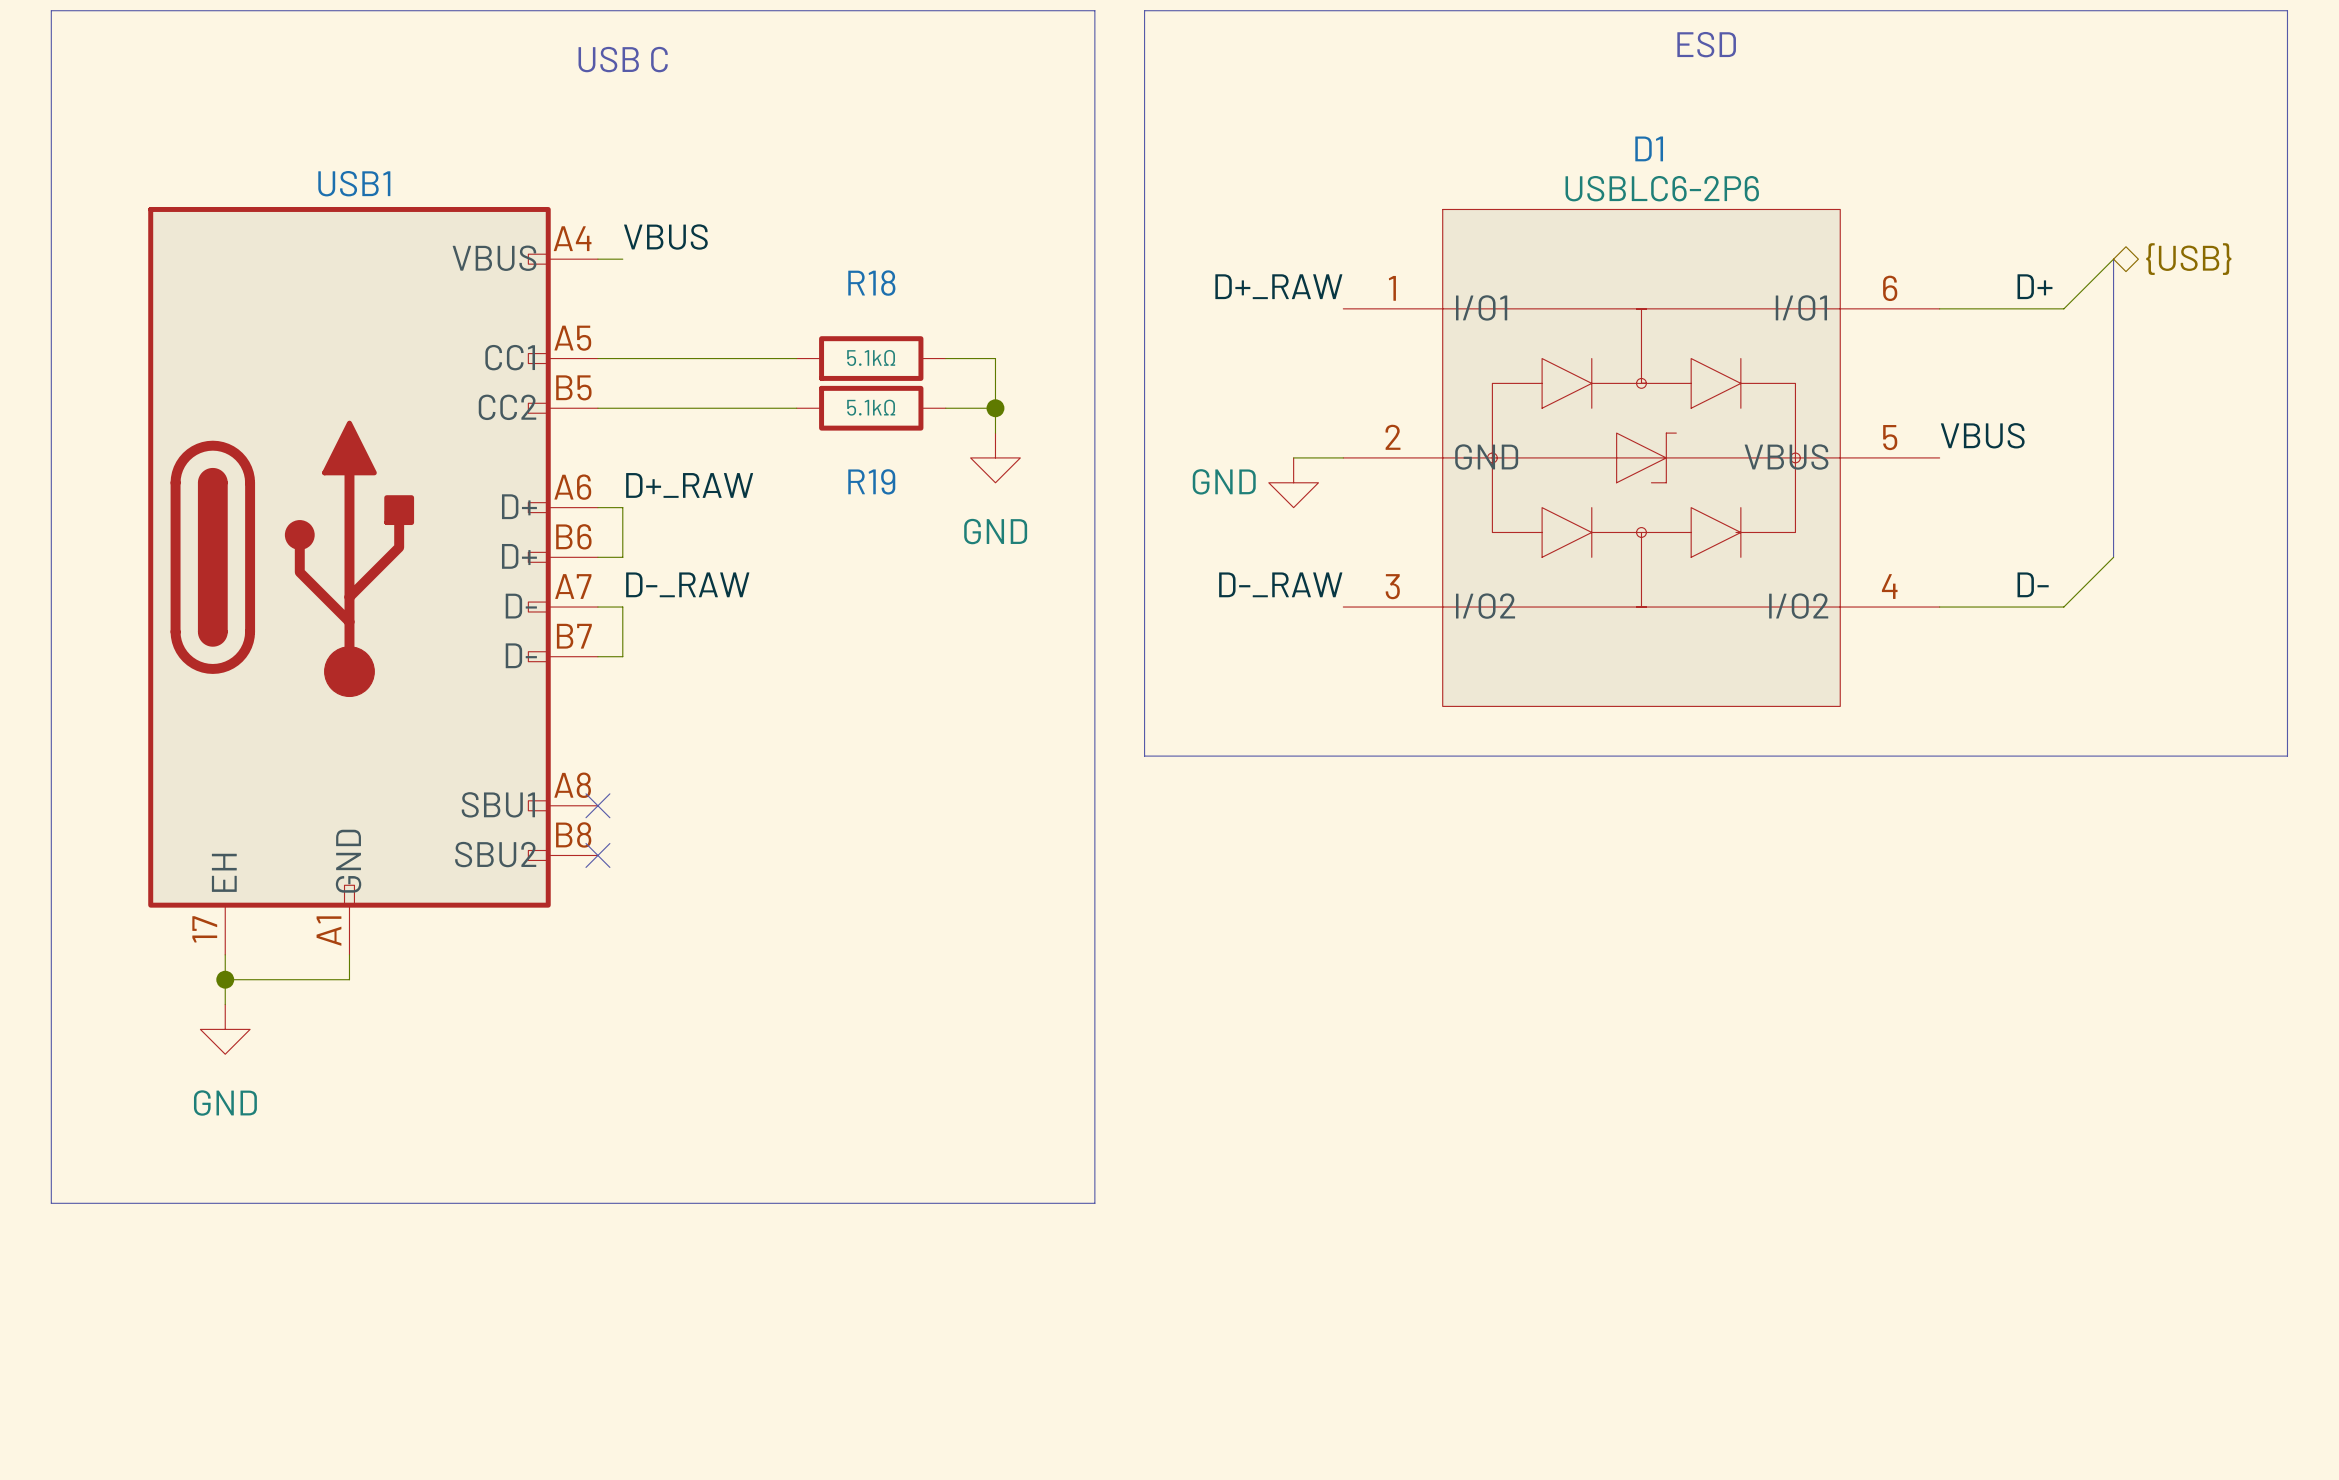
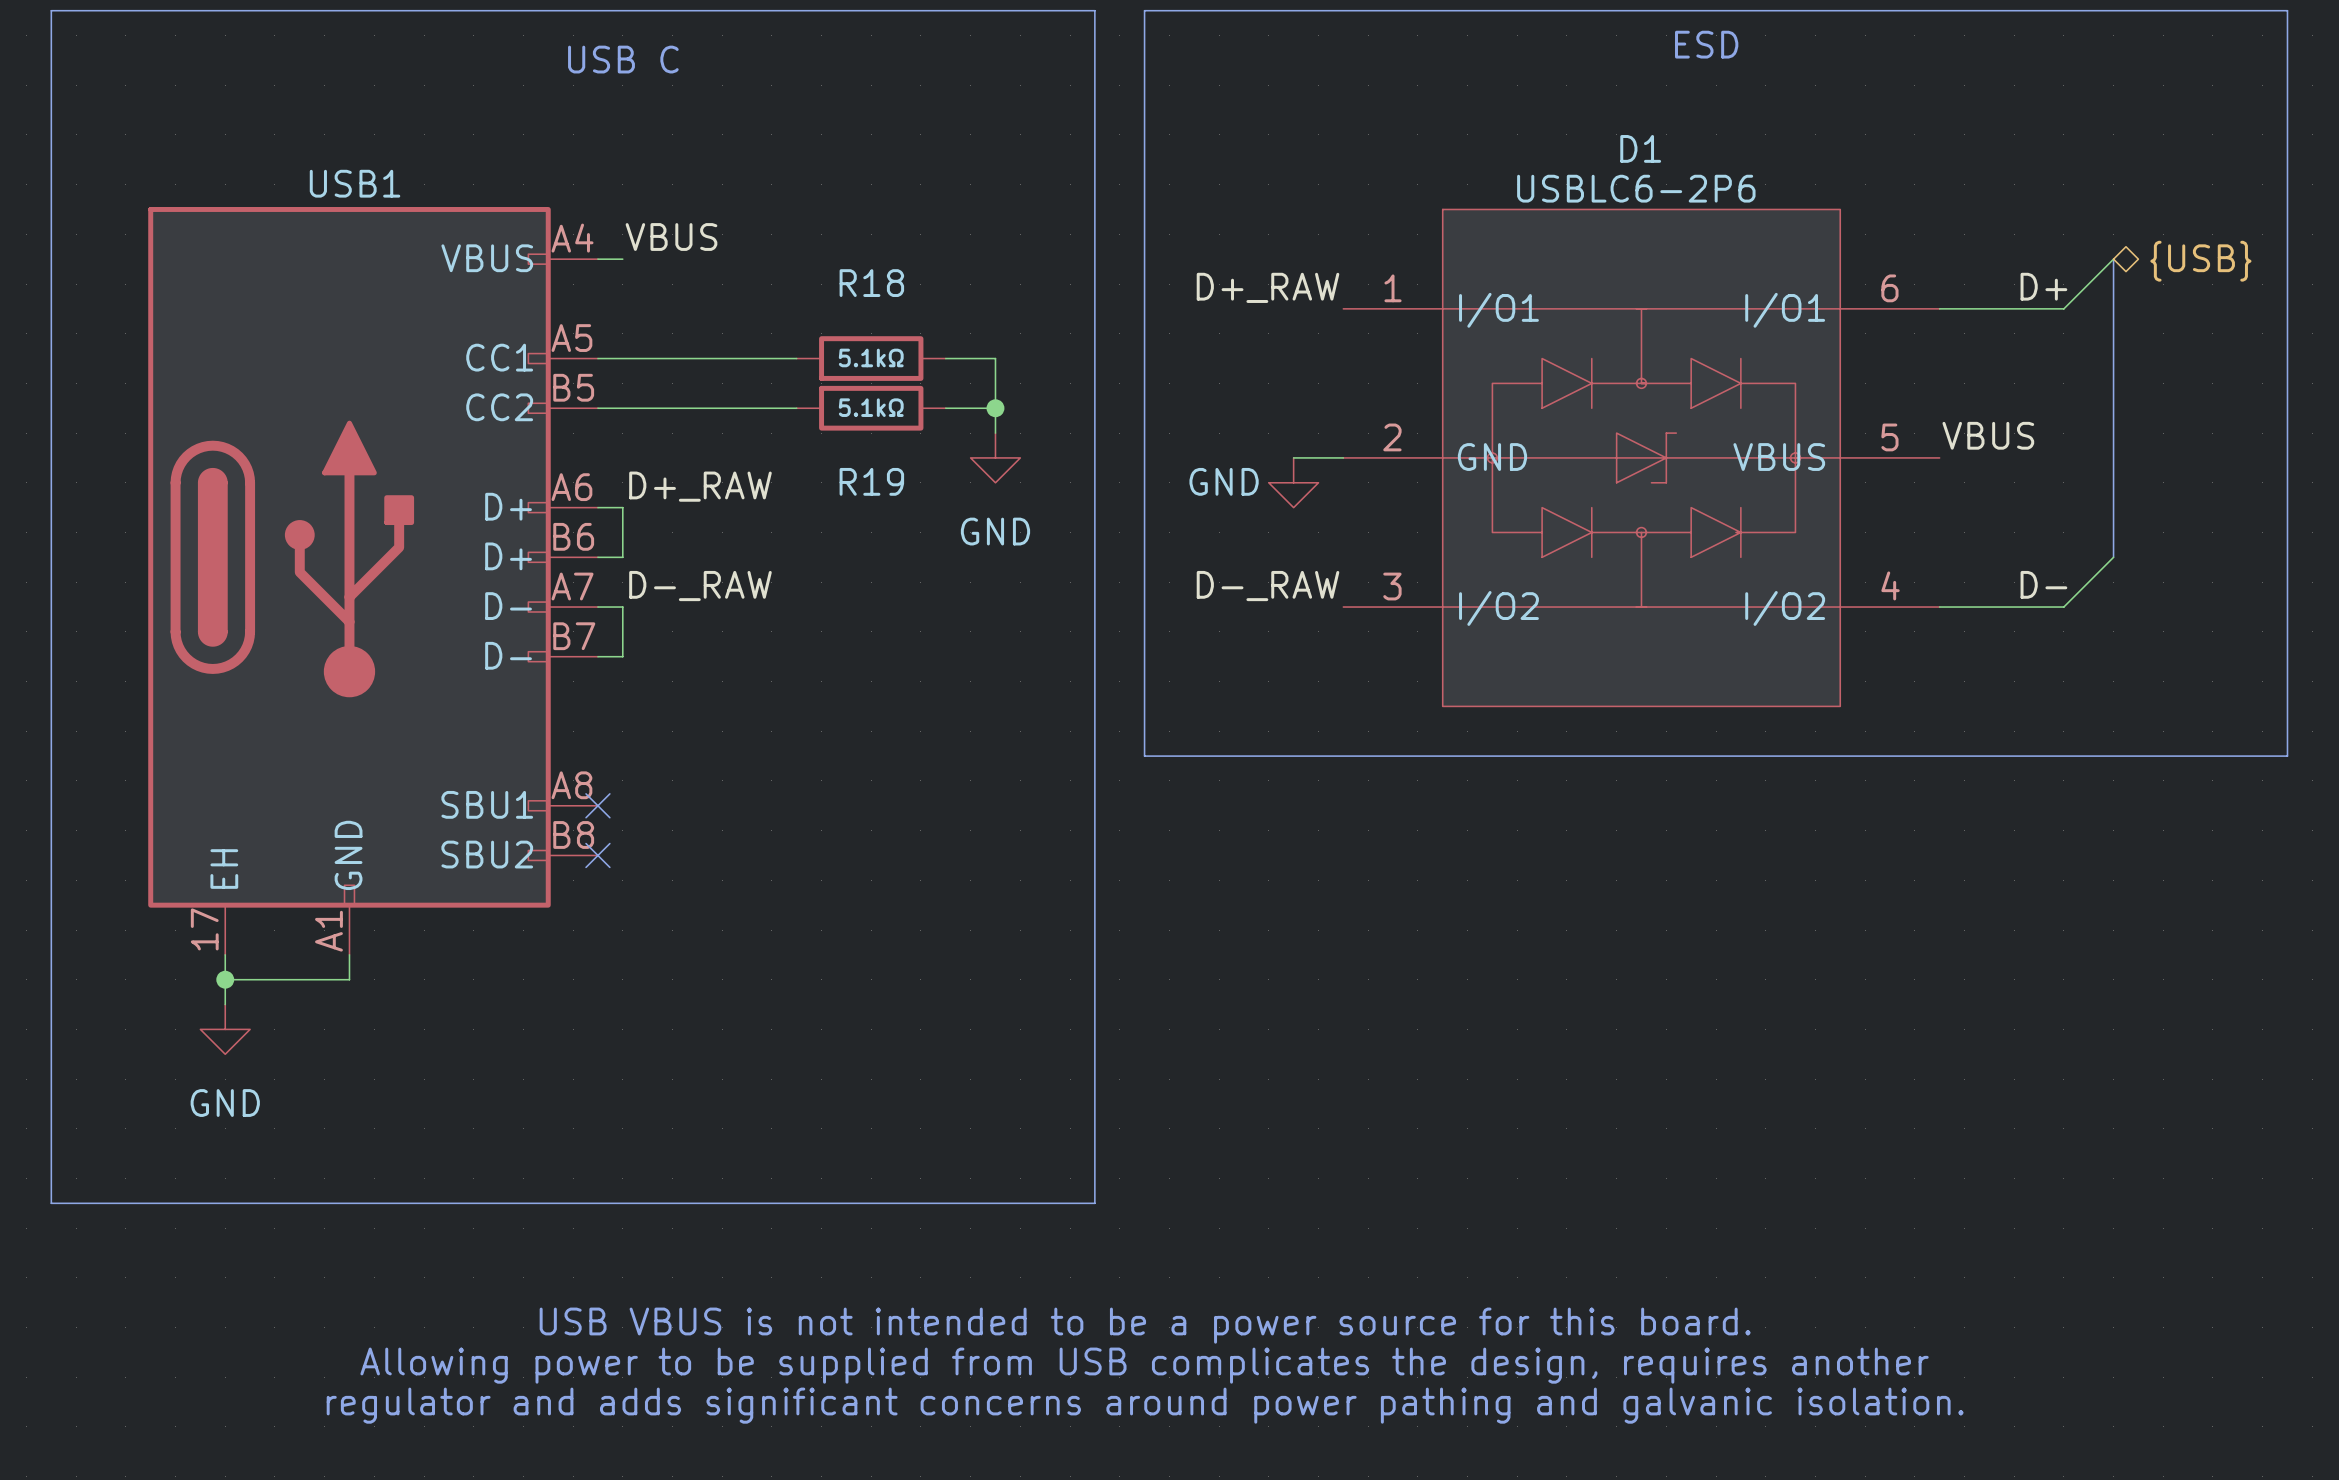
text: none -> USB VBUS is not intended to be a power source for this board. (1145, 1325)
text: none -> Allowing power to be supplied from USB complicates the design, requires another (1144, 1365)
text: none -> regulator and adds significant concerns around power pathing and galvanic isolation. (1145, 1405)

